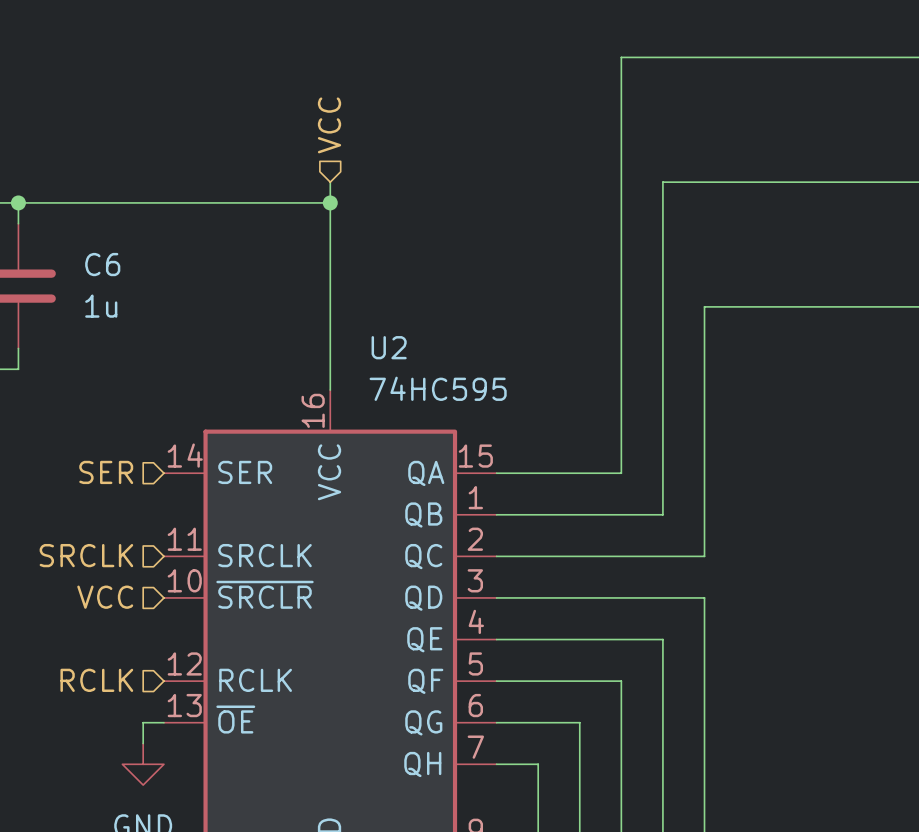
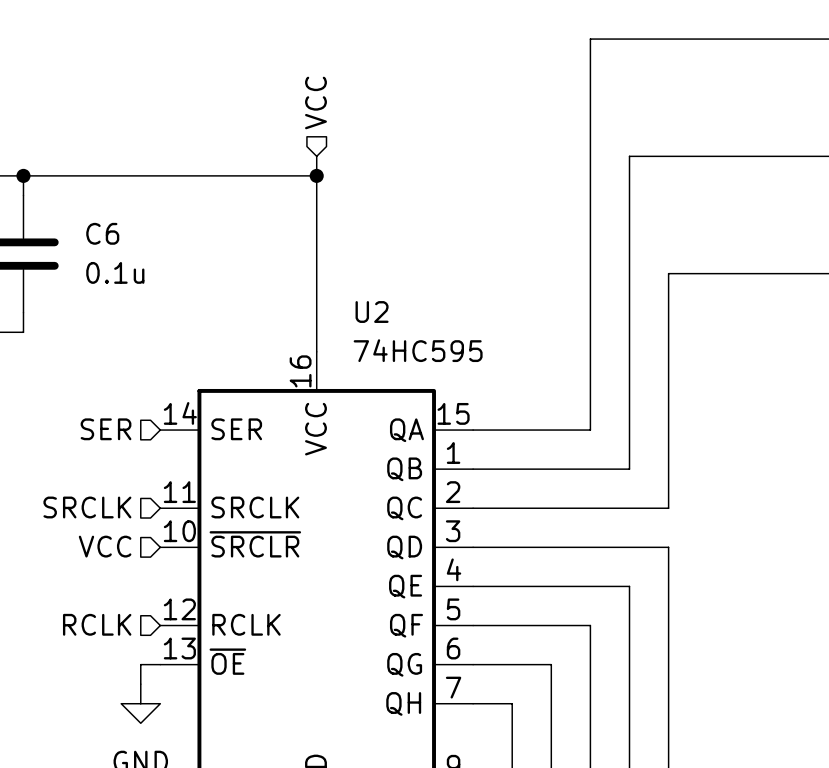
C6 value: 1u (101, 306) -> 0.1u (115, 272)

